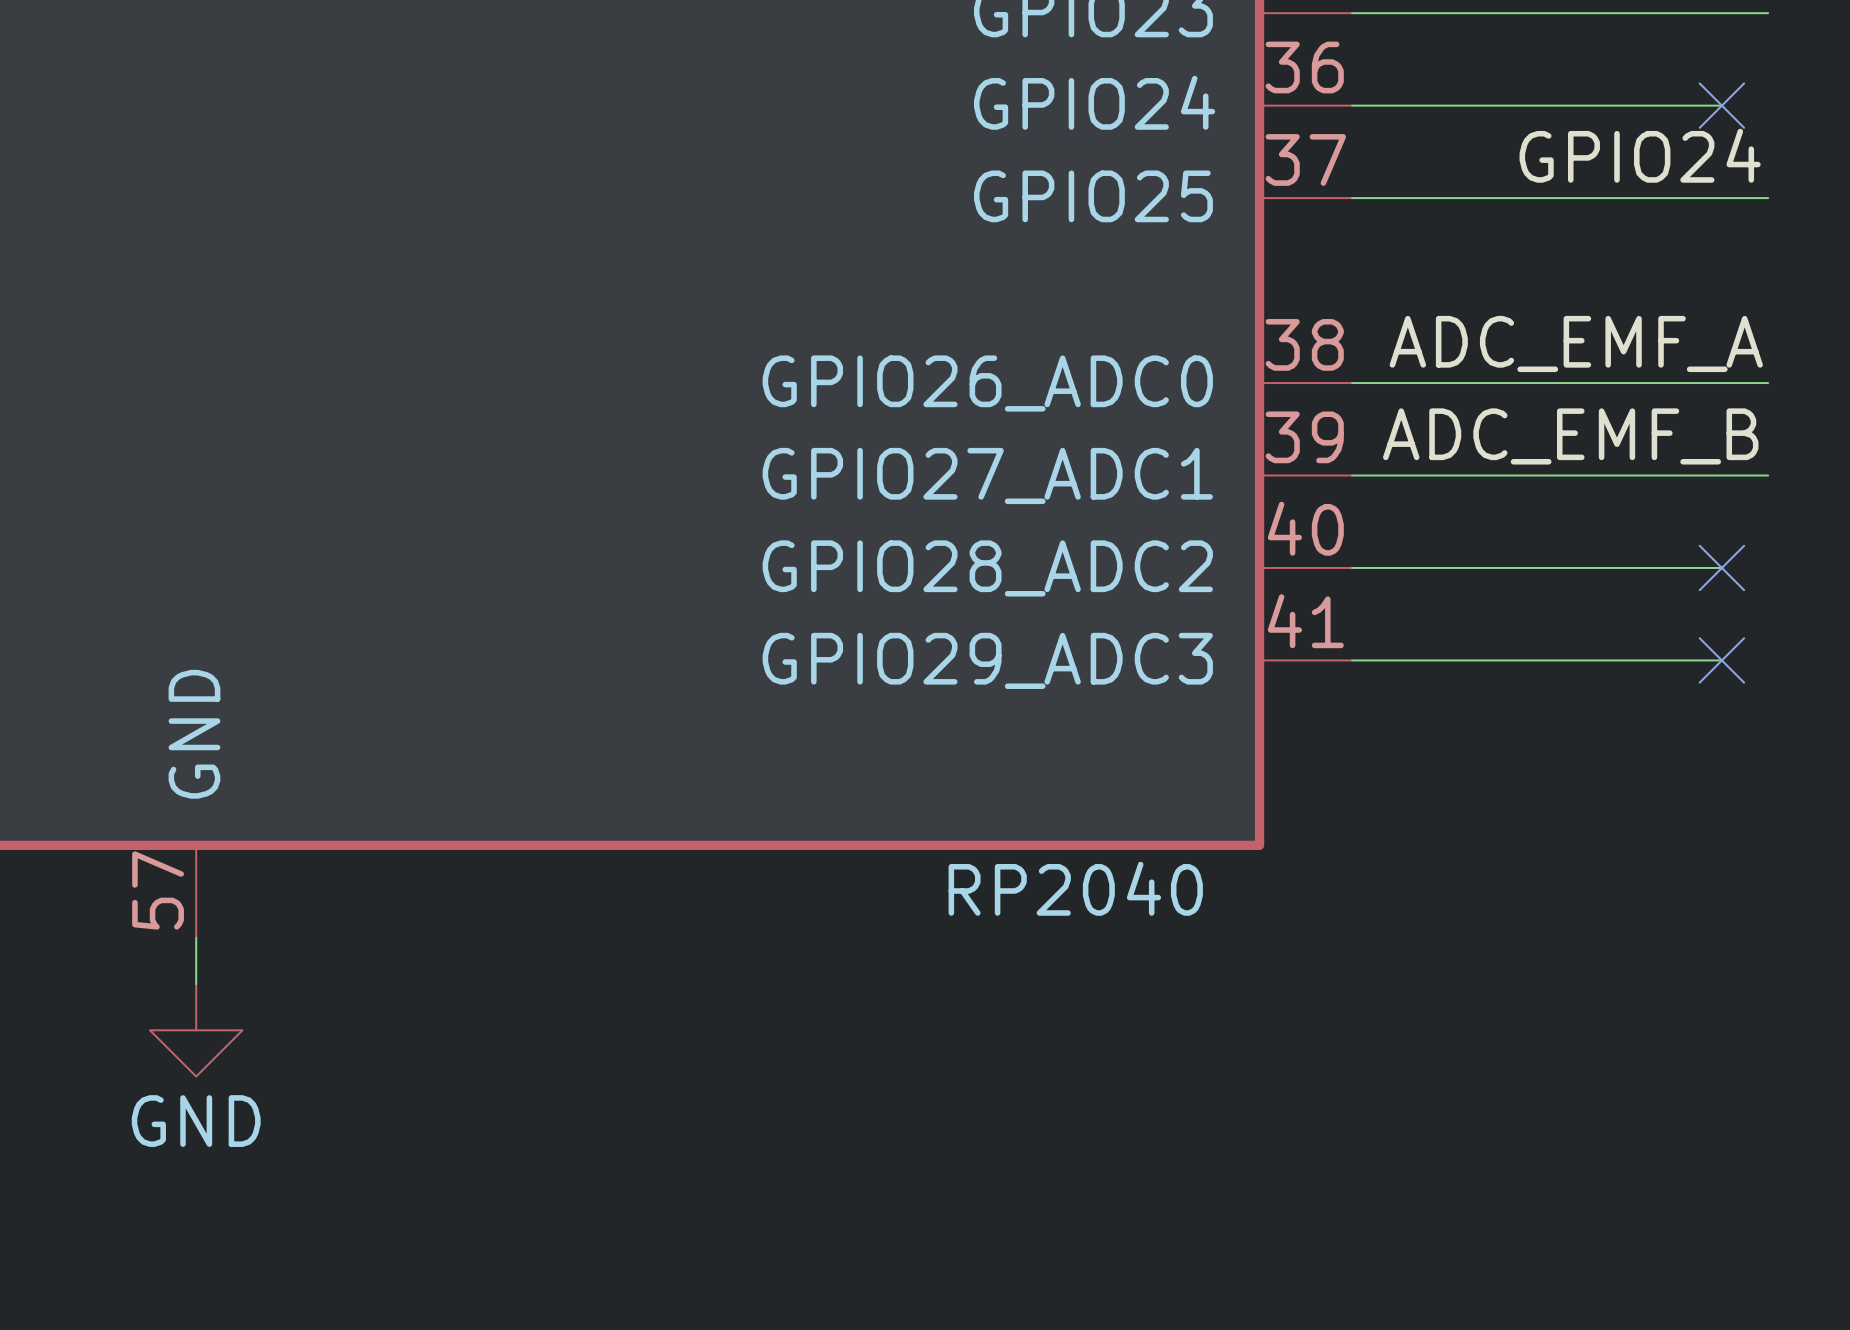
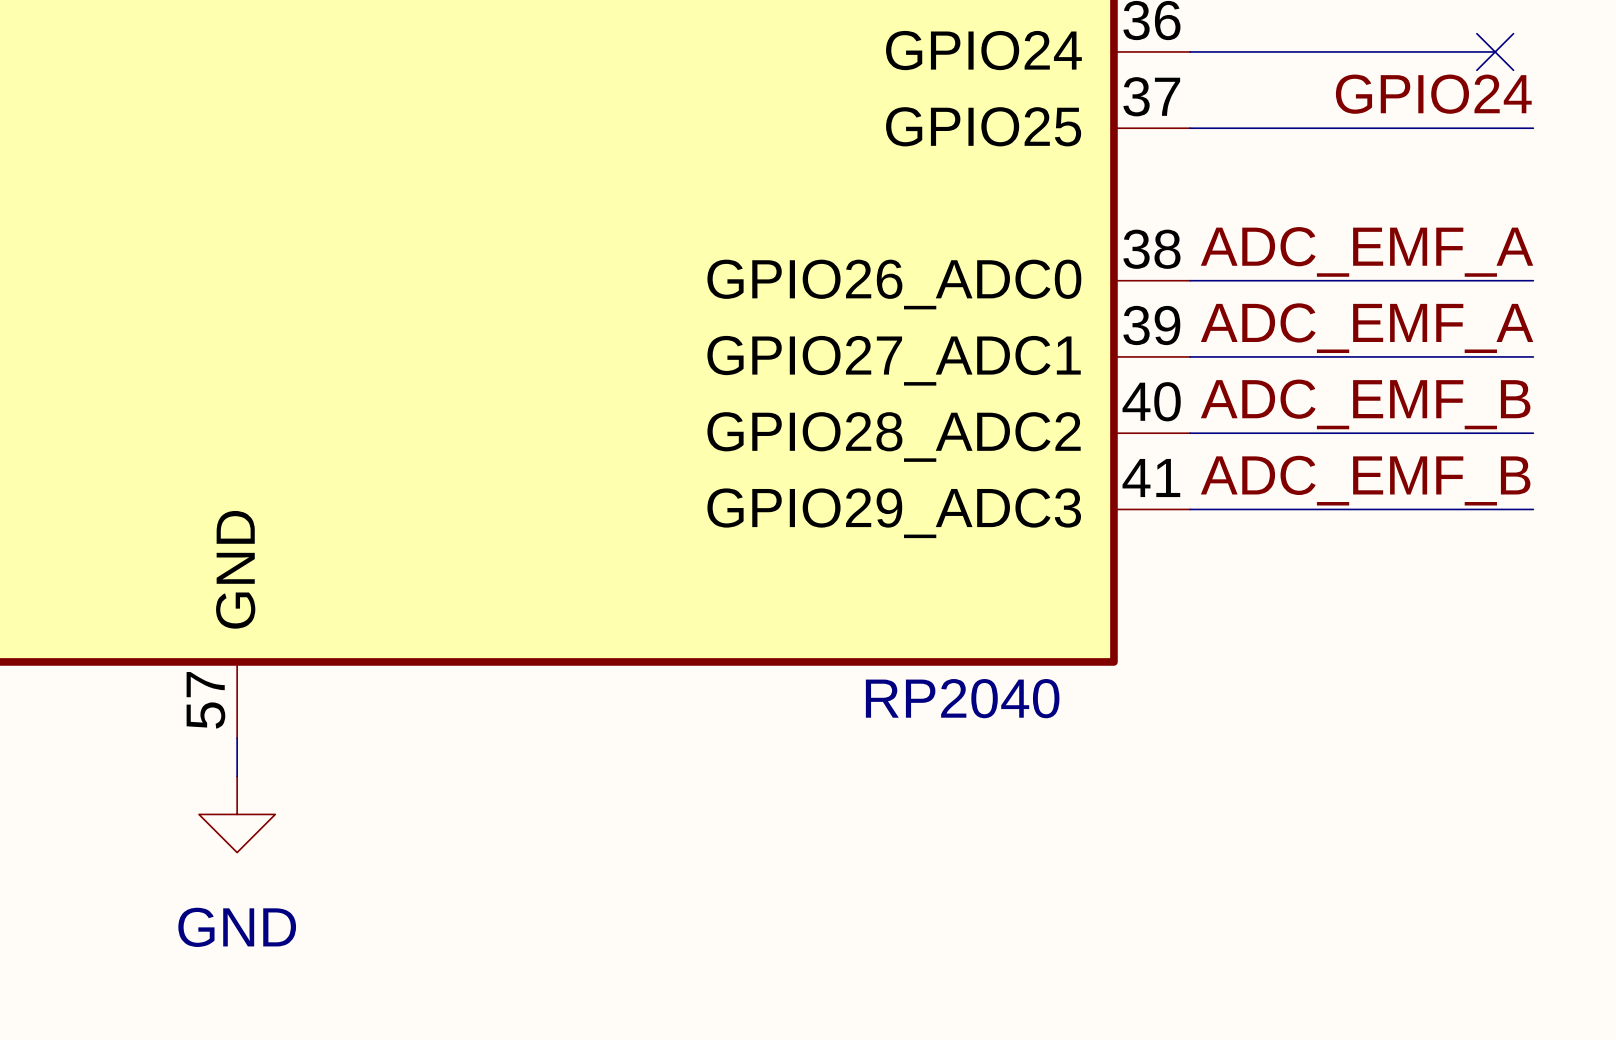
label: ADC_EMF_B (1570, 436) -> ADC_EMF_A (1367, 328)
label: none -> ADC_EMF_B (1365, 404)
wire: none -> (1495, 433) (1533, 433)
no-connect mark: (1721, 567) -> none
label: none -> ADC_EMF_B (1365, 480)
wire: none -> (1495, 509) (1533, 509)
no-connect mark: (1721, 660) -> none
power symbol text position: GND (196, 1121) -> GND (237, 927)

